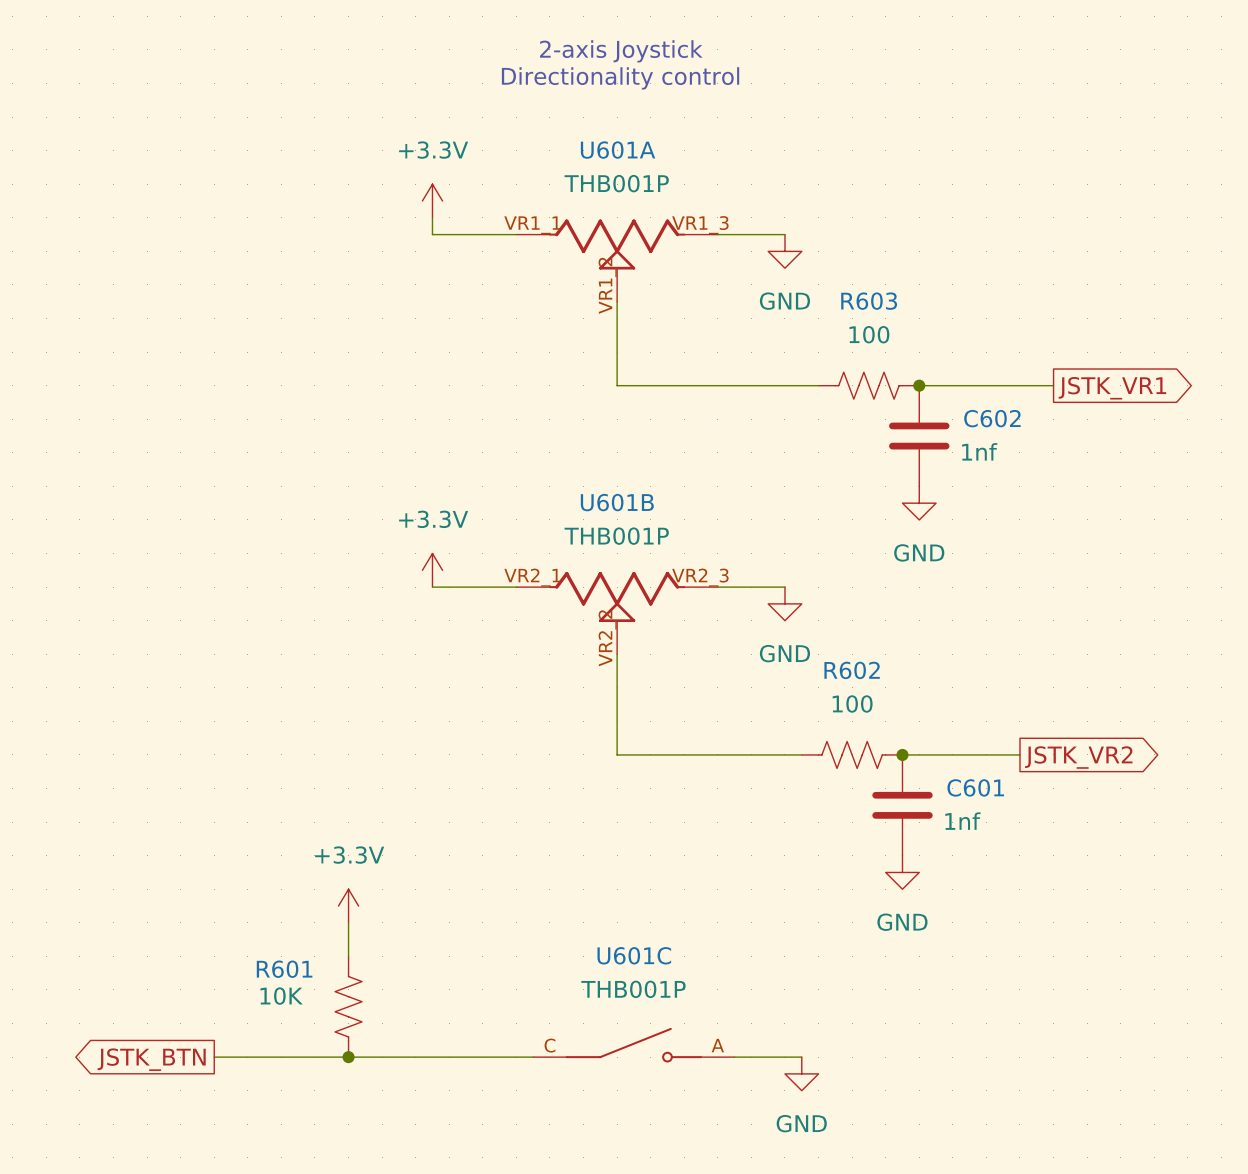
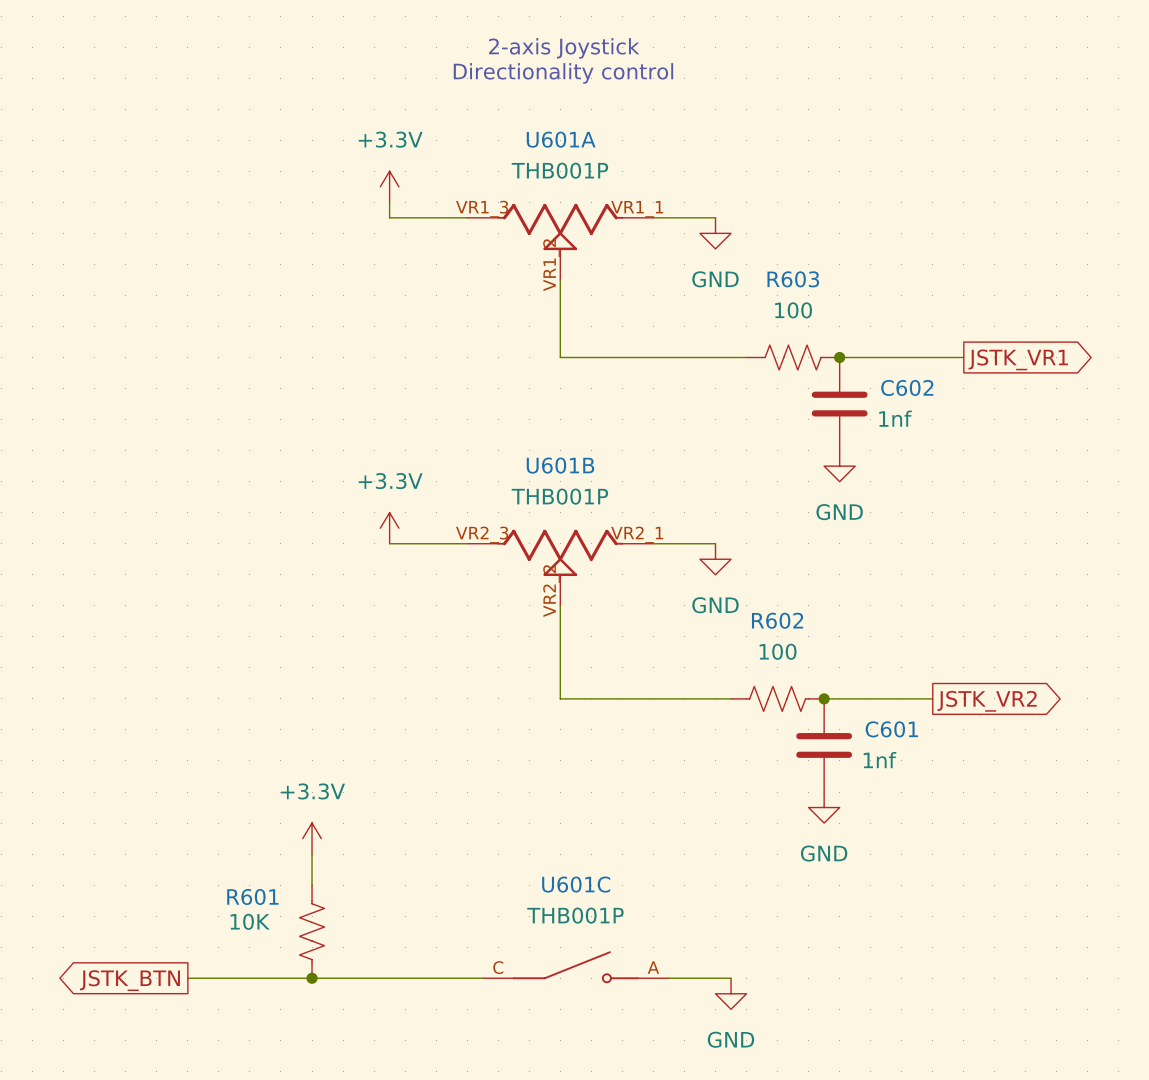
U601A flip: as is (617, 244) -> left-right (560, 226)
U601B flip: as is (617, 597) -> left-right (560, 552)

